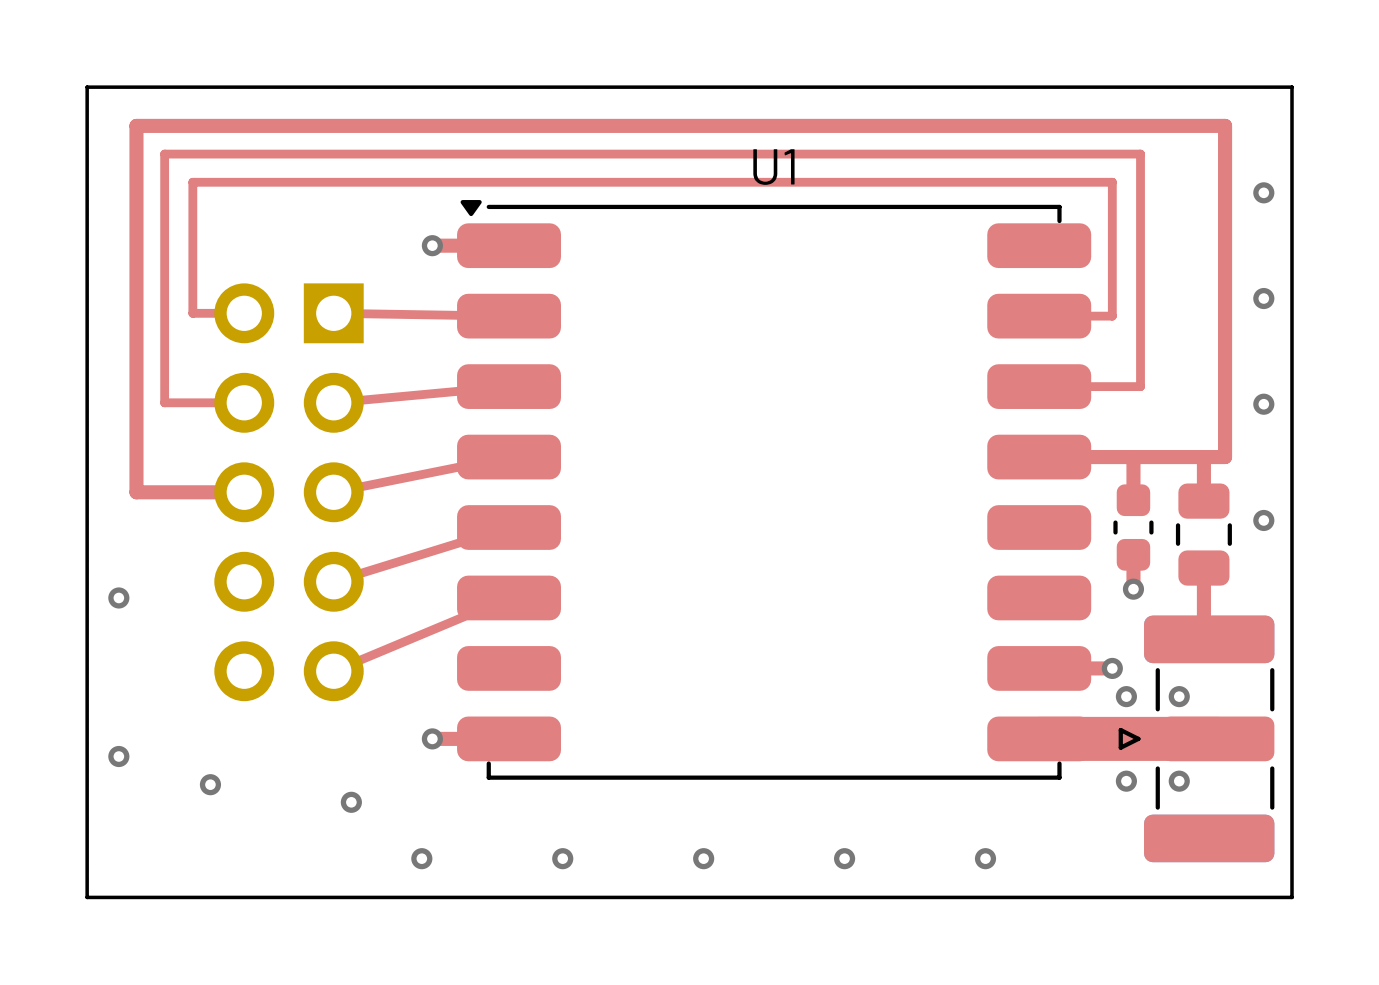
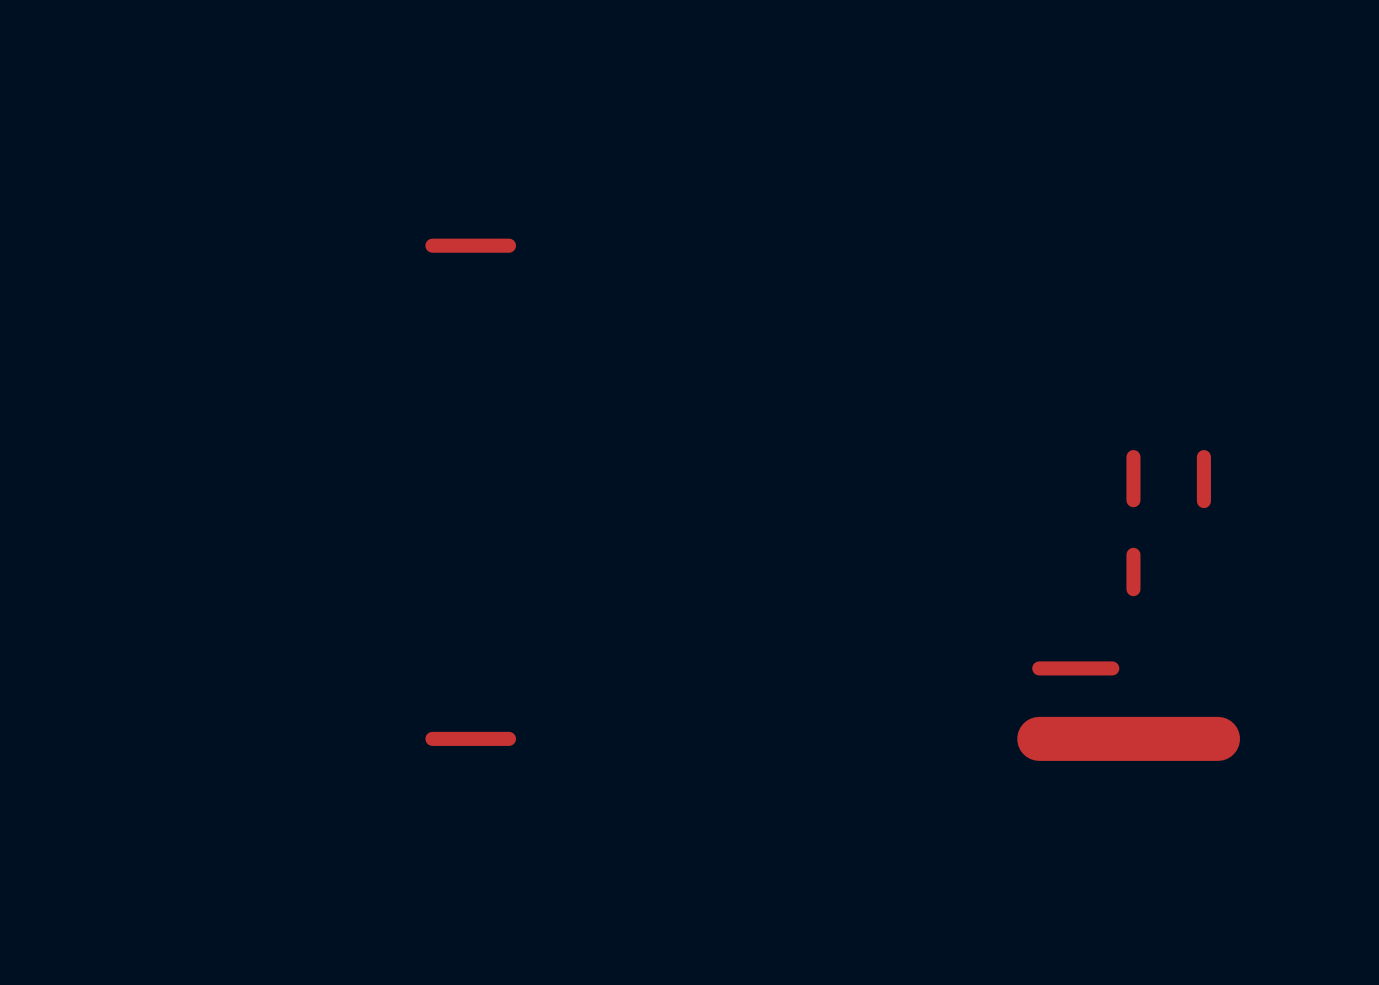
board edge: (87, 87) (1292, 87) (1292, 897) (87, 897) (87, 87) -> none
via: (1263, 192) -> none
via: (432, 245) -> none
via: (1263, 298) -> none
top track: (244, 313) (192, 313) (192, 182) (1112, 182) (1112, 316) (1039, 316) -> none
top track: (333, 313) (509, 316) -> none
top track: (509, 386) (333, 402) -> none
top track: (1039, 386) (1140, 386) (1140, 154) (164, 154) (164, 402) (244, 402) -> none
via: (1263, 404) -> none
top track: (509, 457) (333, 492) -> none
top track: (1039, 457) (1225, 457) (1225, 125) (136, 125) (136, 492) (244, 492) -> none
U1: (774, 489) -> none
part: (289, 492) -> none
via: (1263, 520) -> none
top track: (509, 527) (333, 581) -> none
part: (1133, 527) -> none
part: (1203, 534) -> none
top track: (1203, 568) (1203, 619) -> none
via: (1133, 589) -> none
via: (118, 597) -> none
top track: (509, 597) (333, 671) -> none
via: (1112, 668) -> none
via: (1126, 696) -> none
via: (1179, 696) -> none
via: (432, 738) -> none
part: (1196, 738) -> none
via: (118, 756) -> none
via: (1126, 781) -> none
via: (1179, 781) -> none
via: (210, 784) -> none
via: (351, 802) -> none
via: (421, 858) -> none
via: (562, 858) -> none
via: (703, 858) -> none
via: (844, 858) -> none
via: (985, 858) -> none

